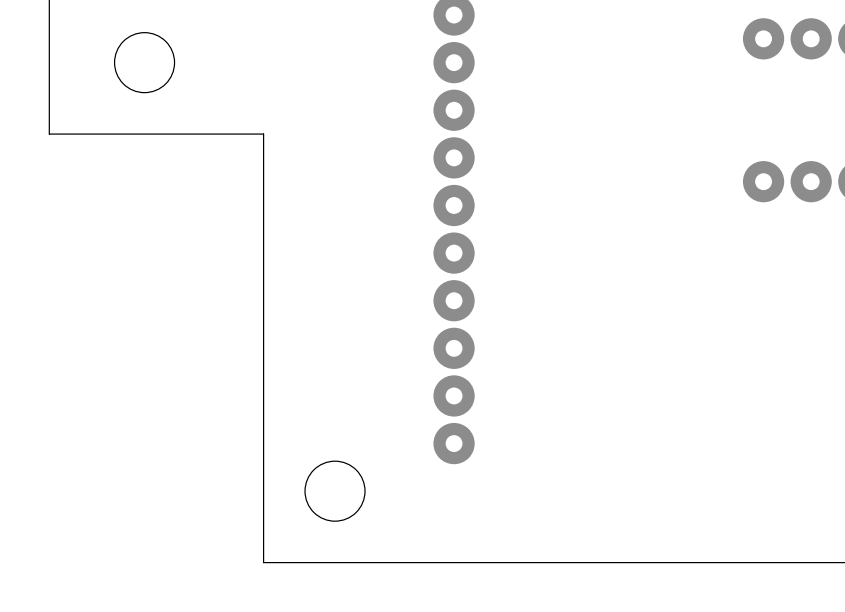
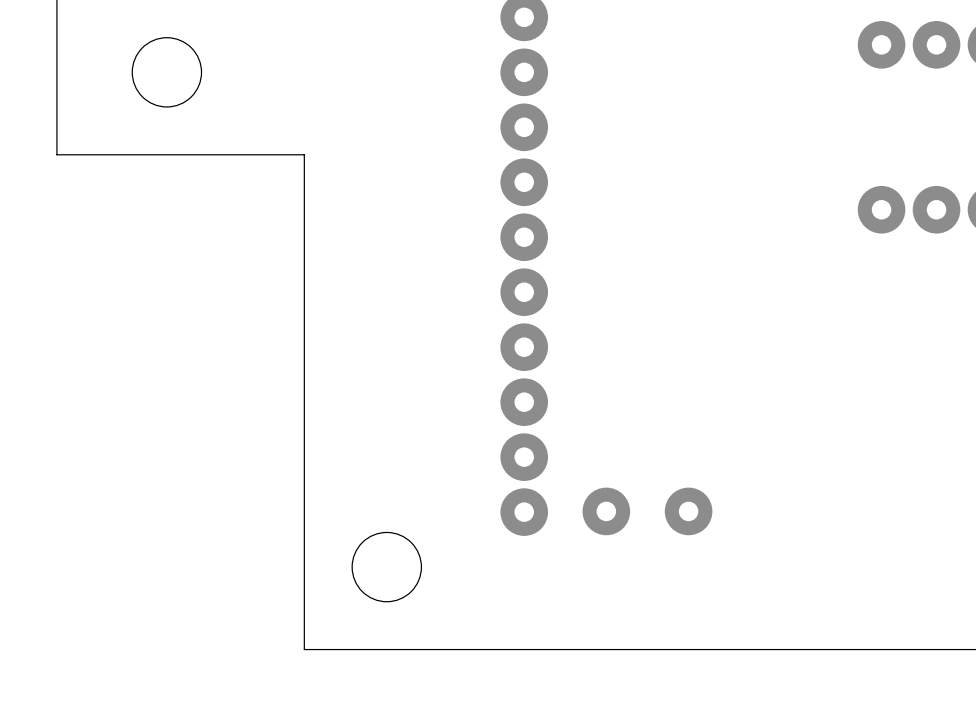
part: none -> (647, 511)

